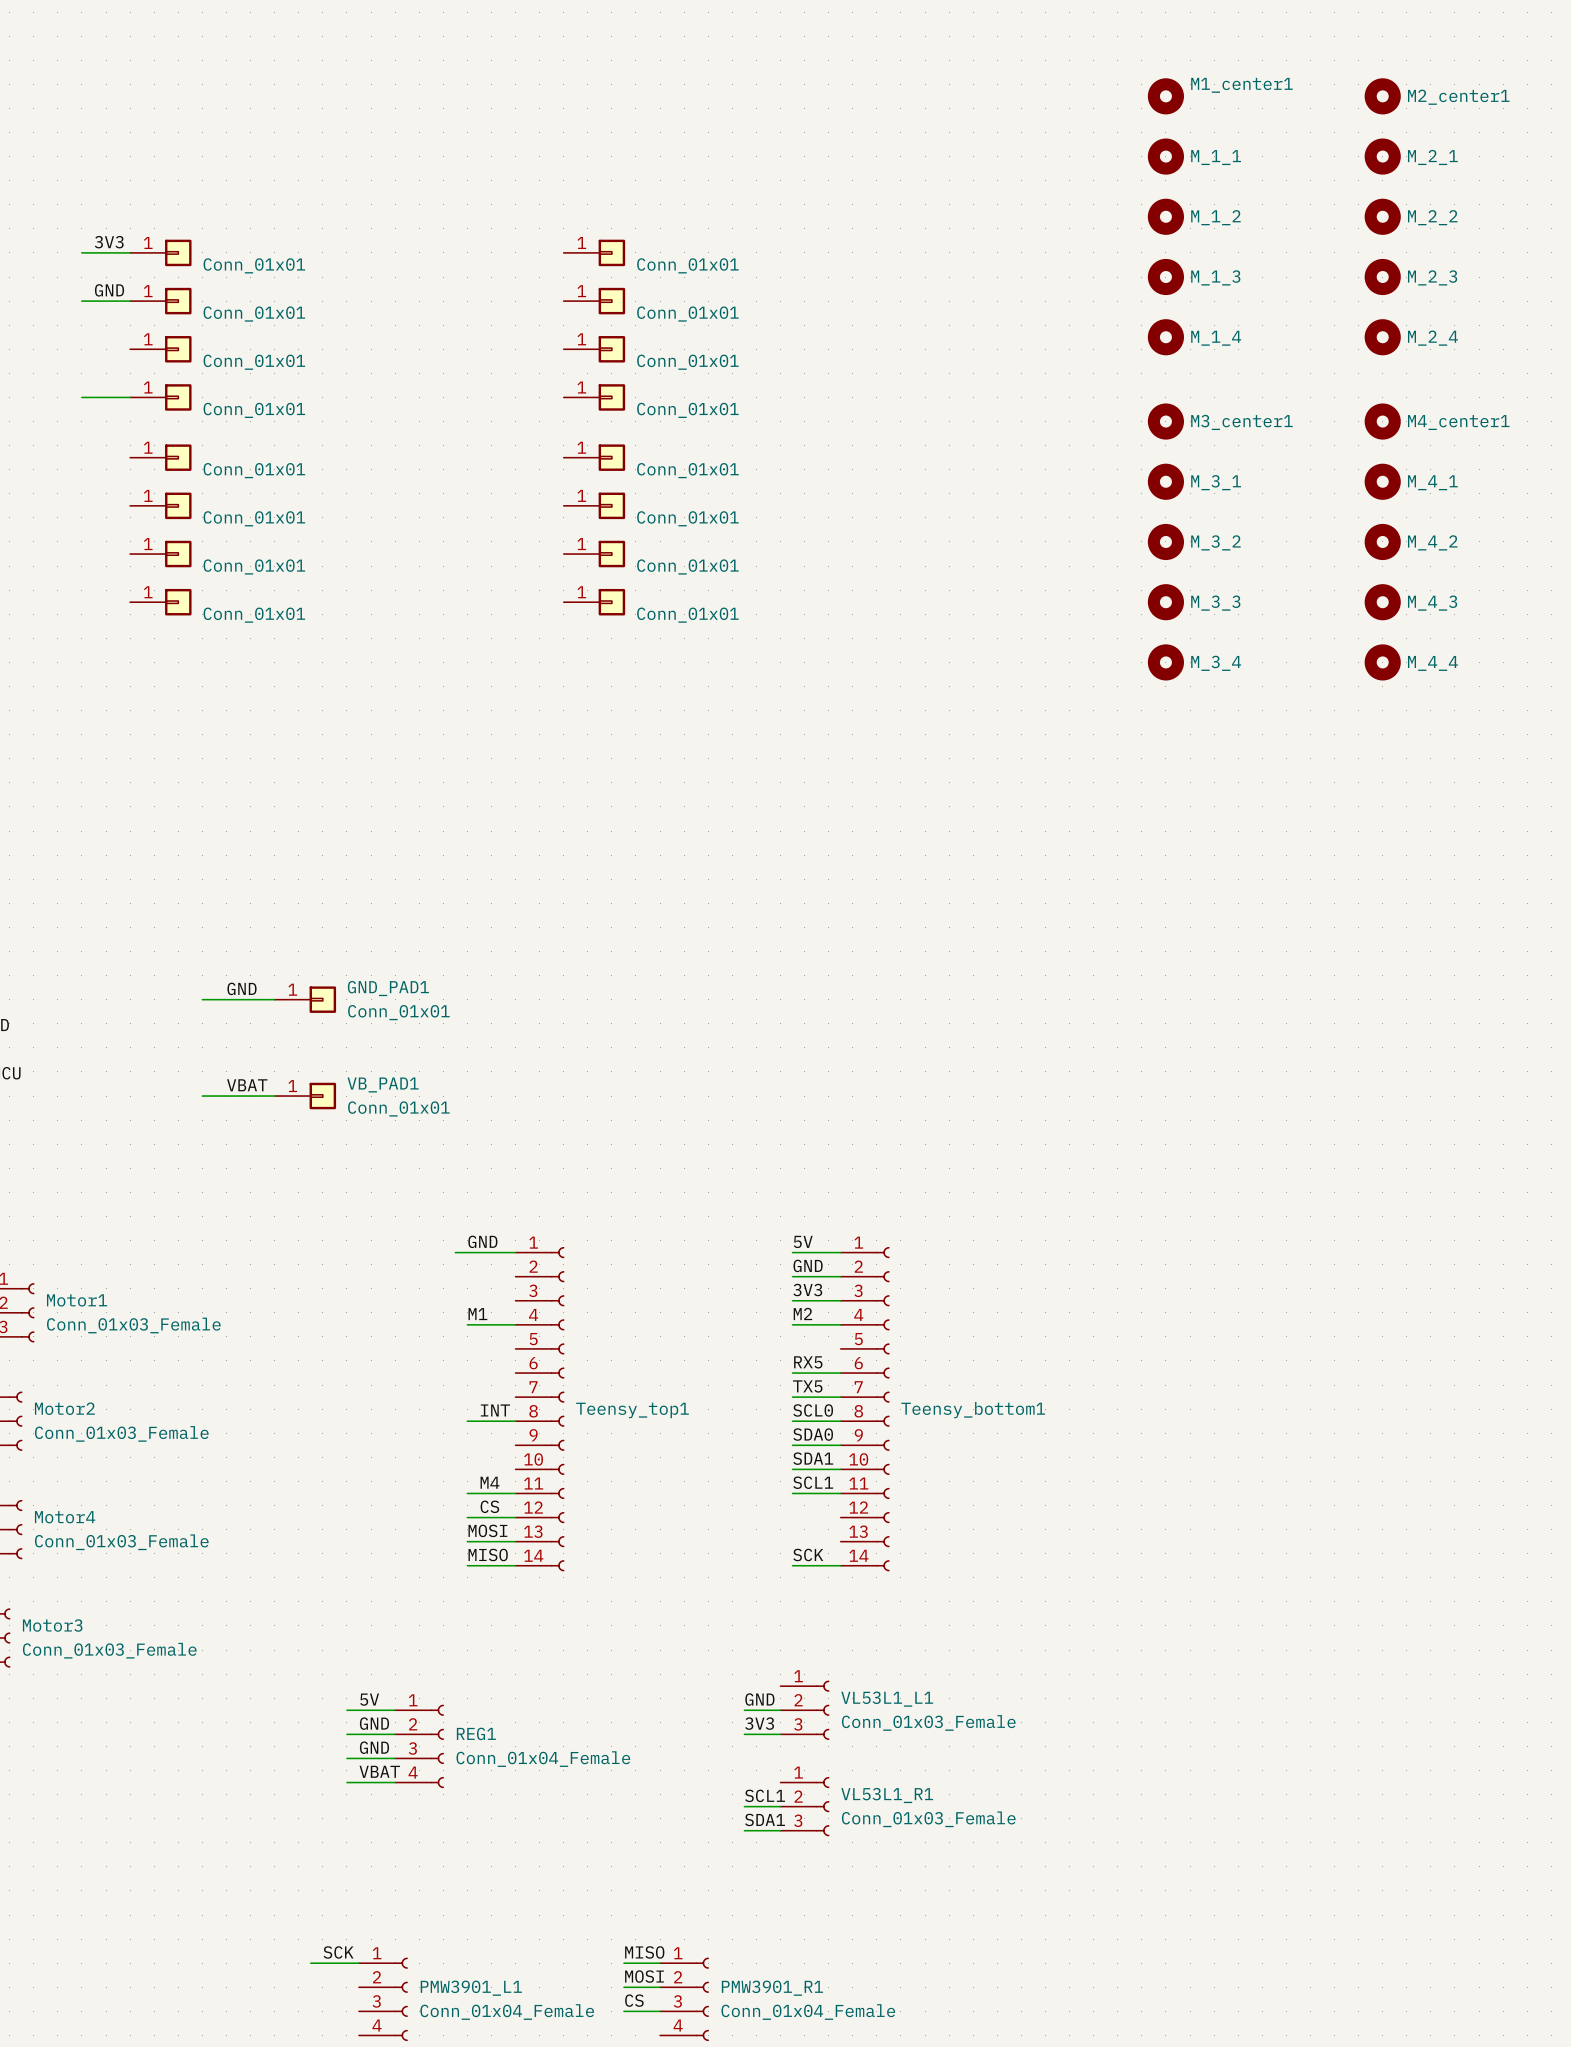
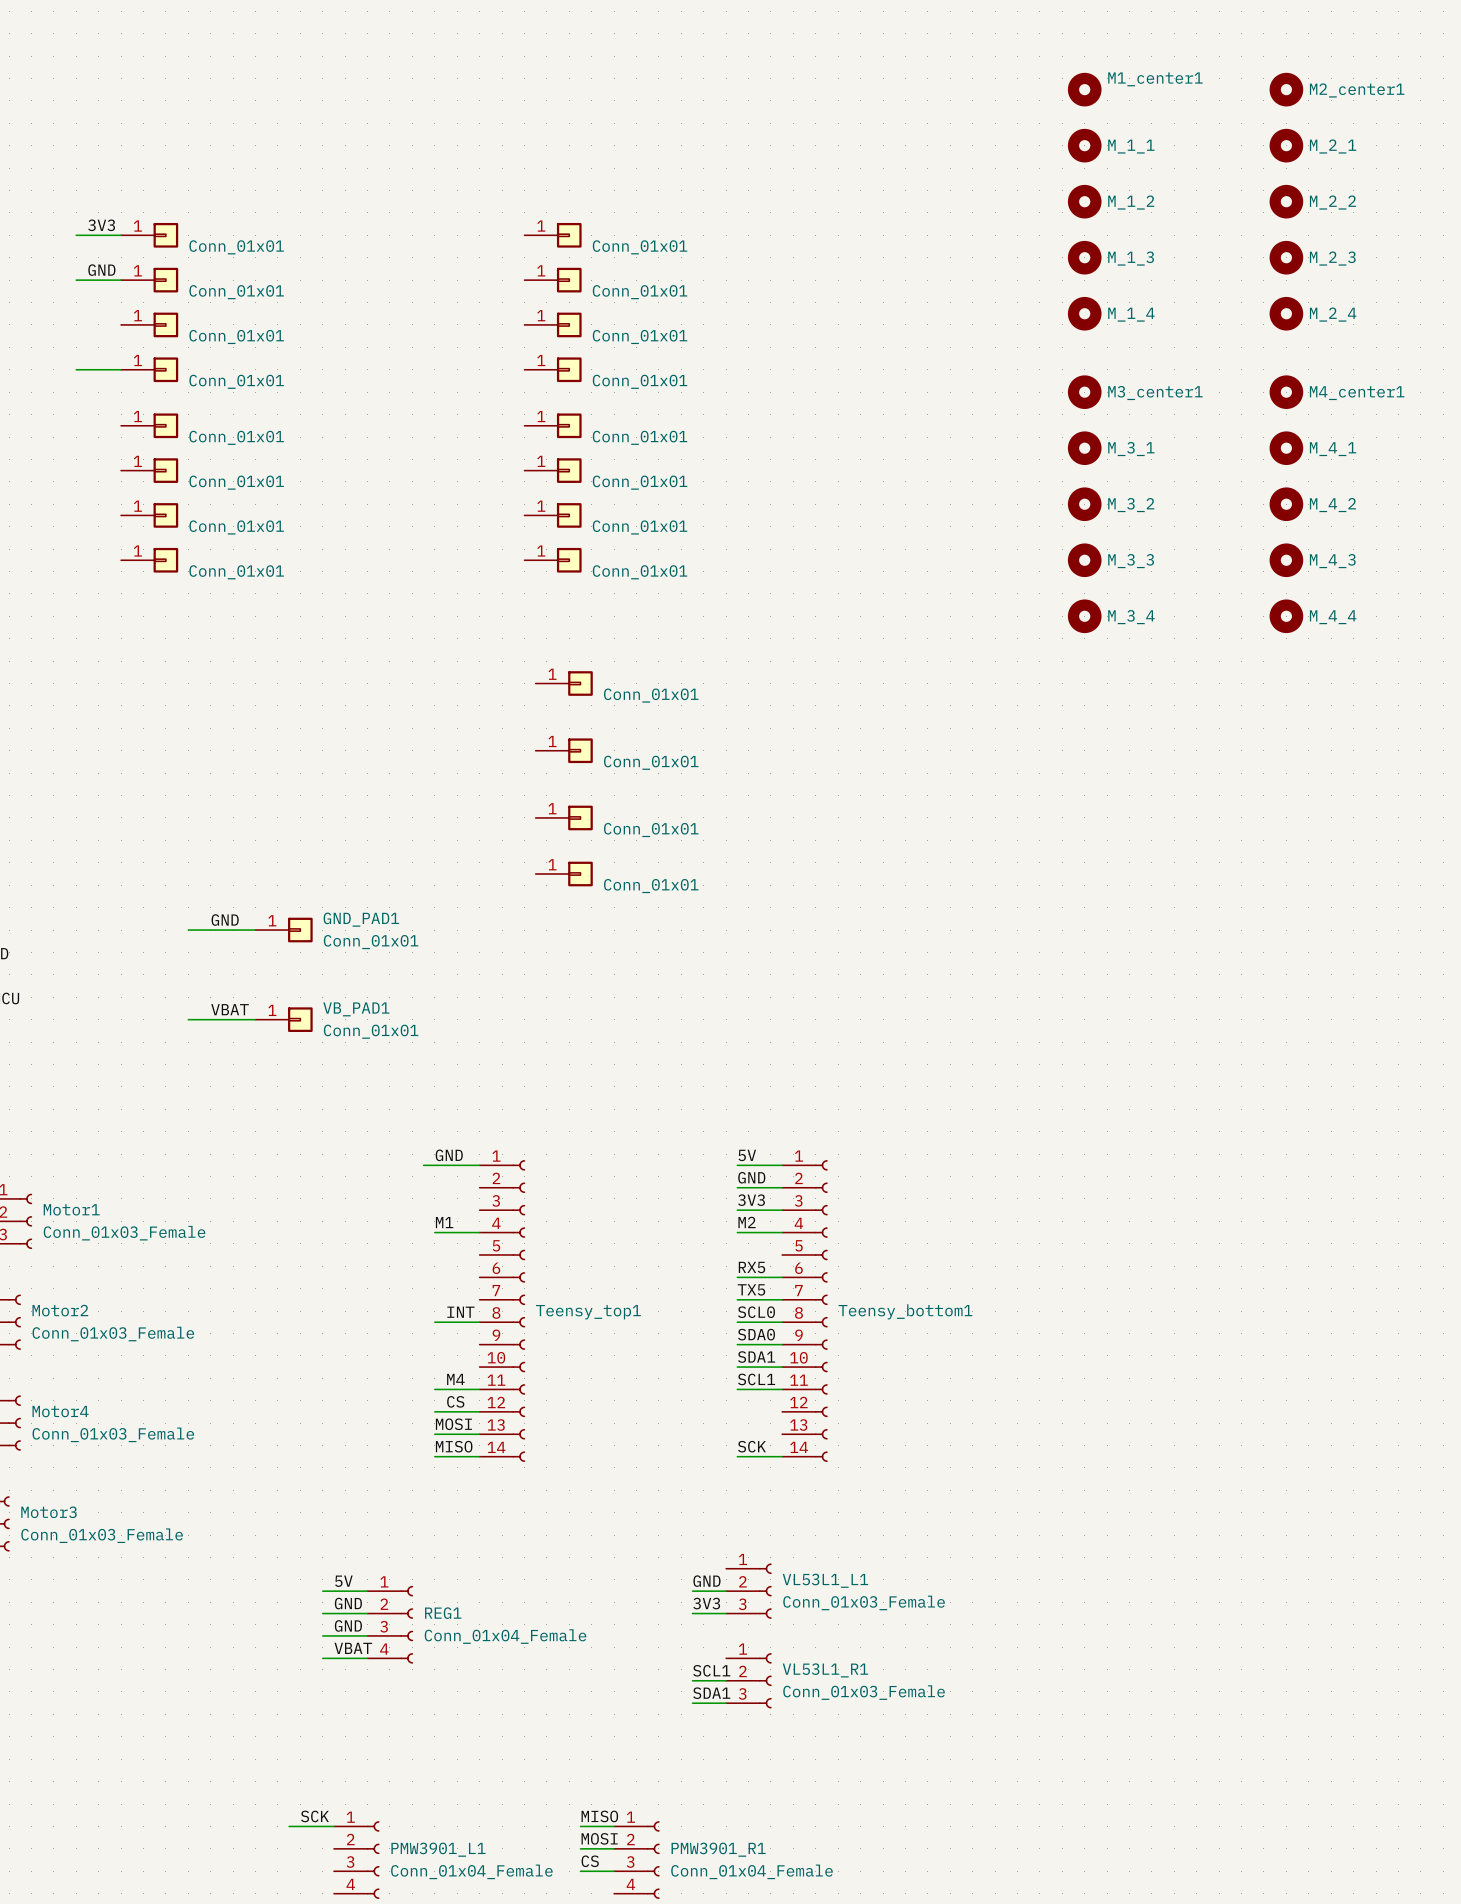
part: none -> Conn_01x01 (564, 683)
part: none -> Conn_01x01 (564, 750)
part: none -> Conn_01x01 (564, 817)
part: none -> Conn_01x01 (564, 874)

